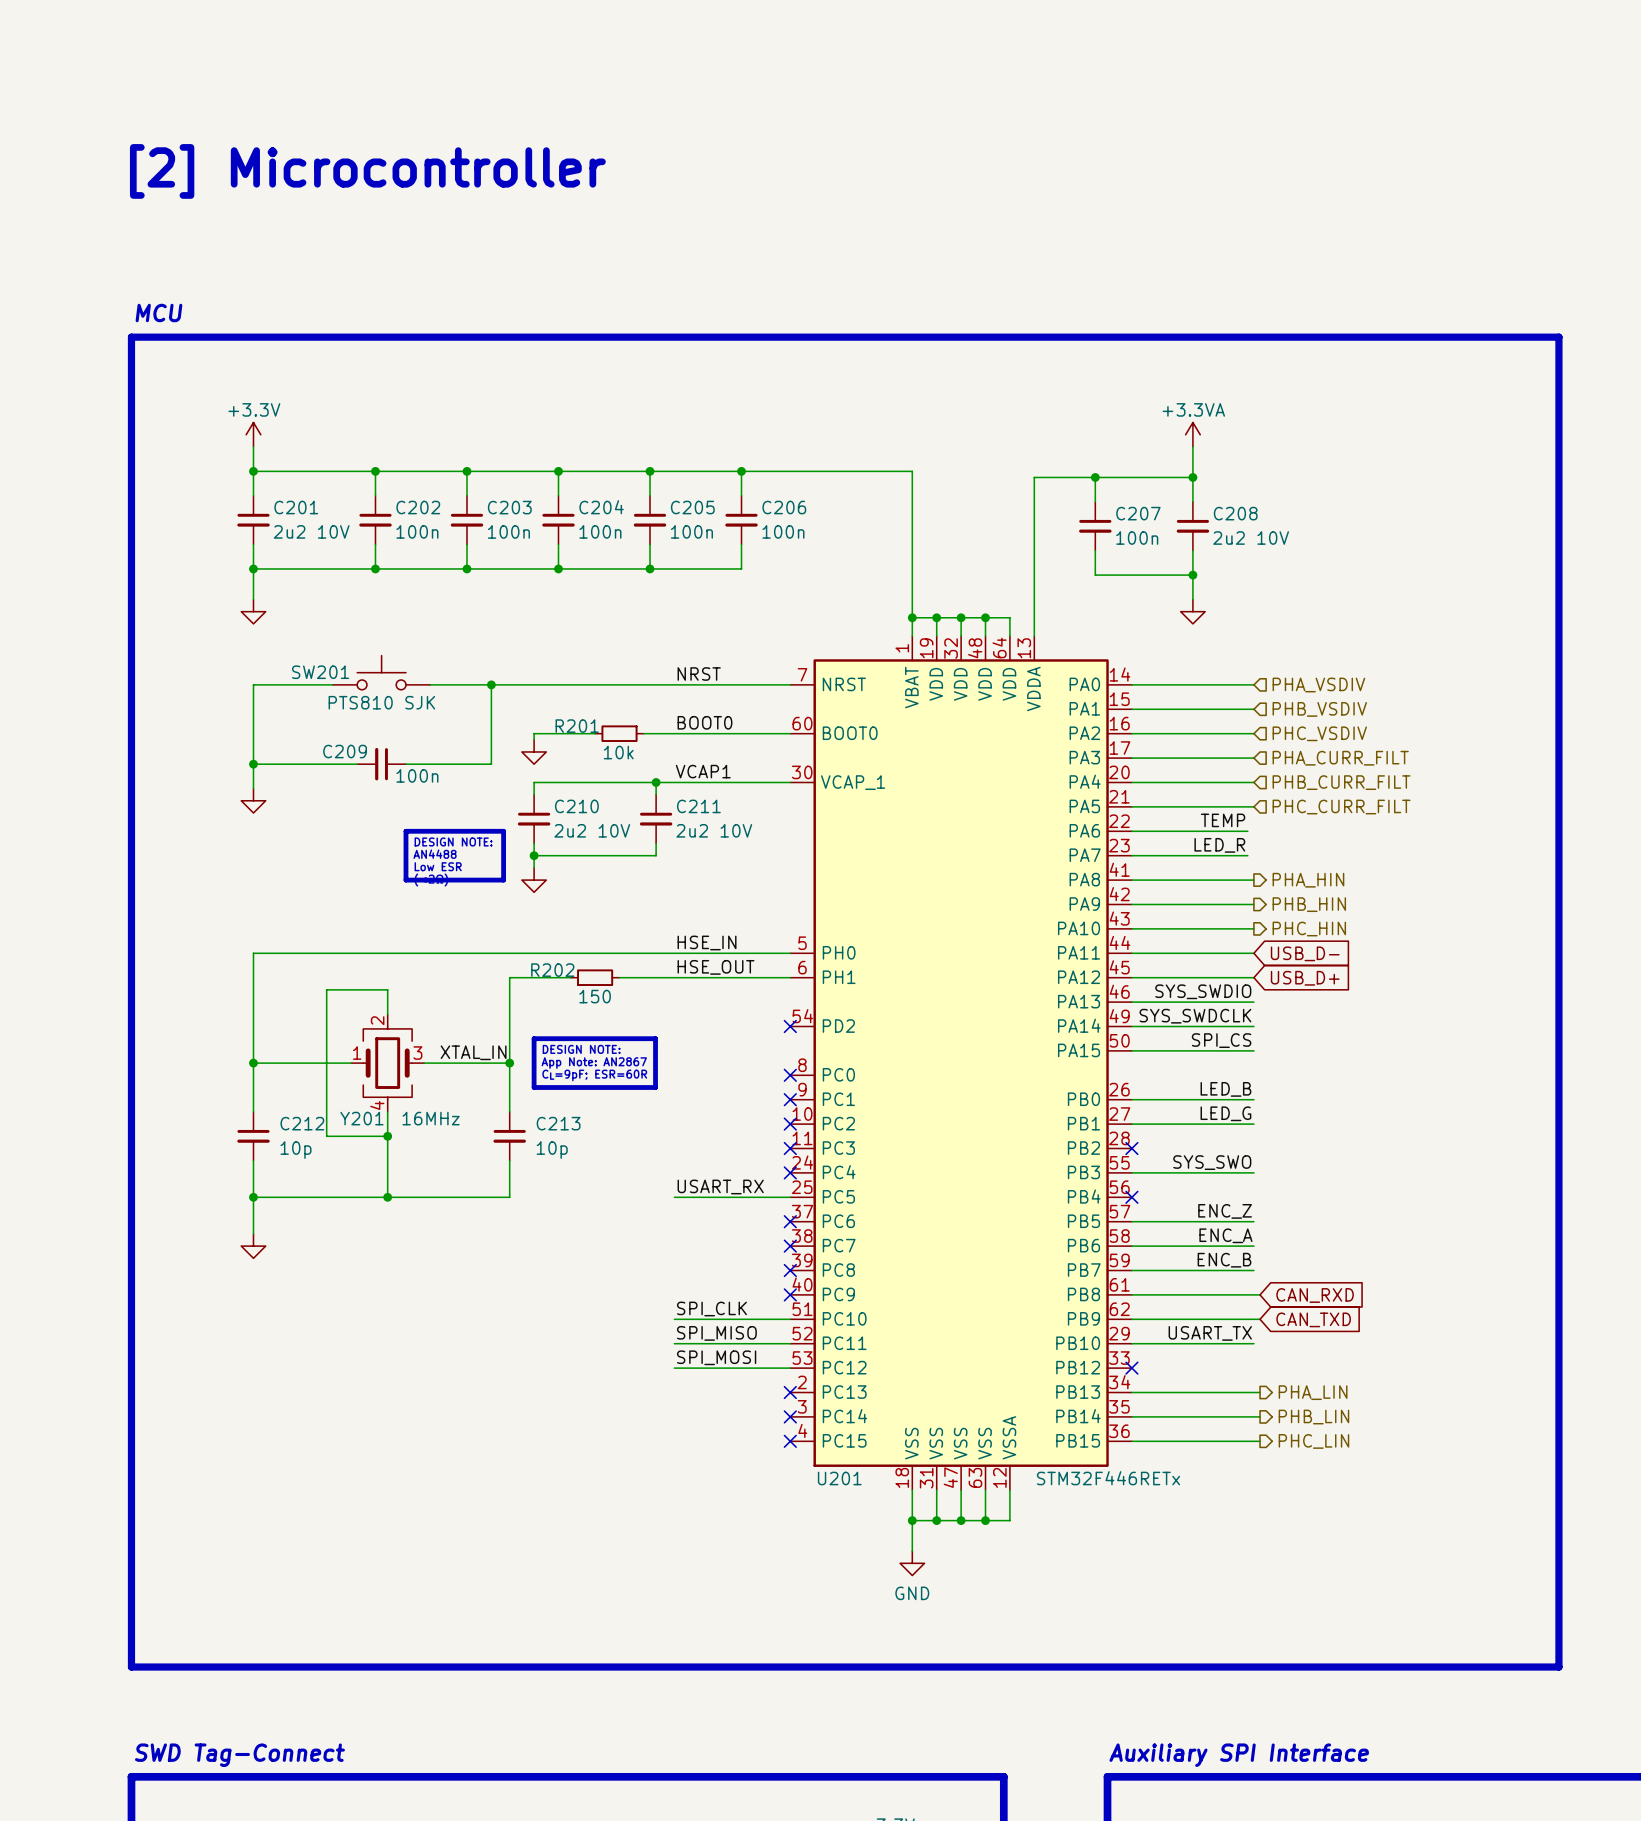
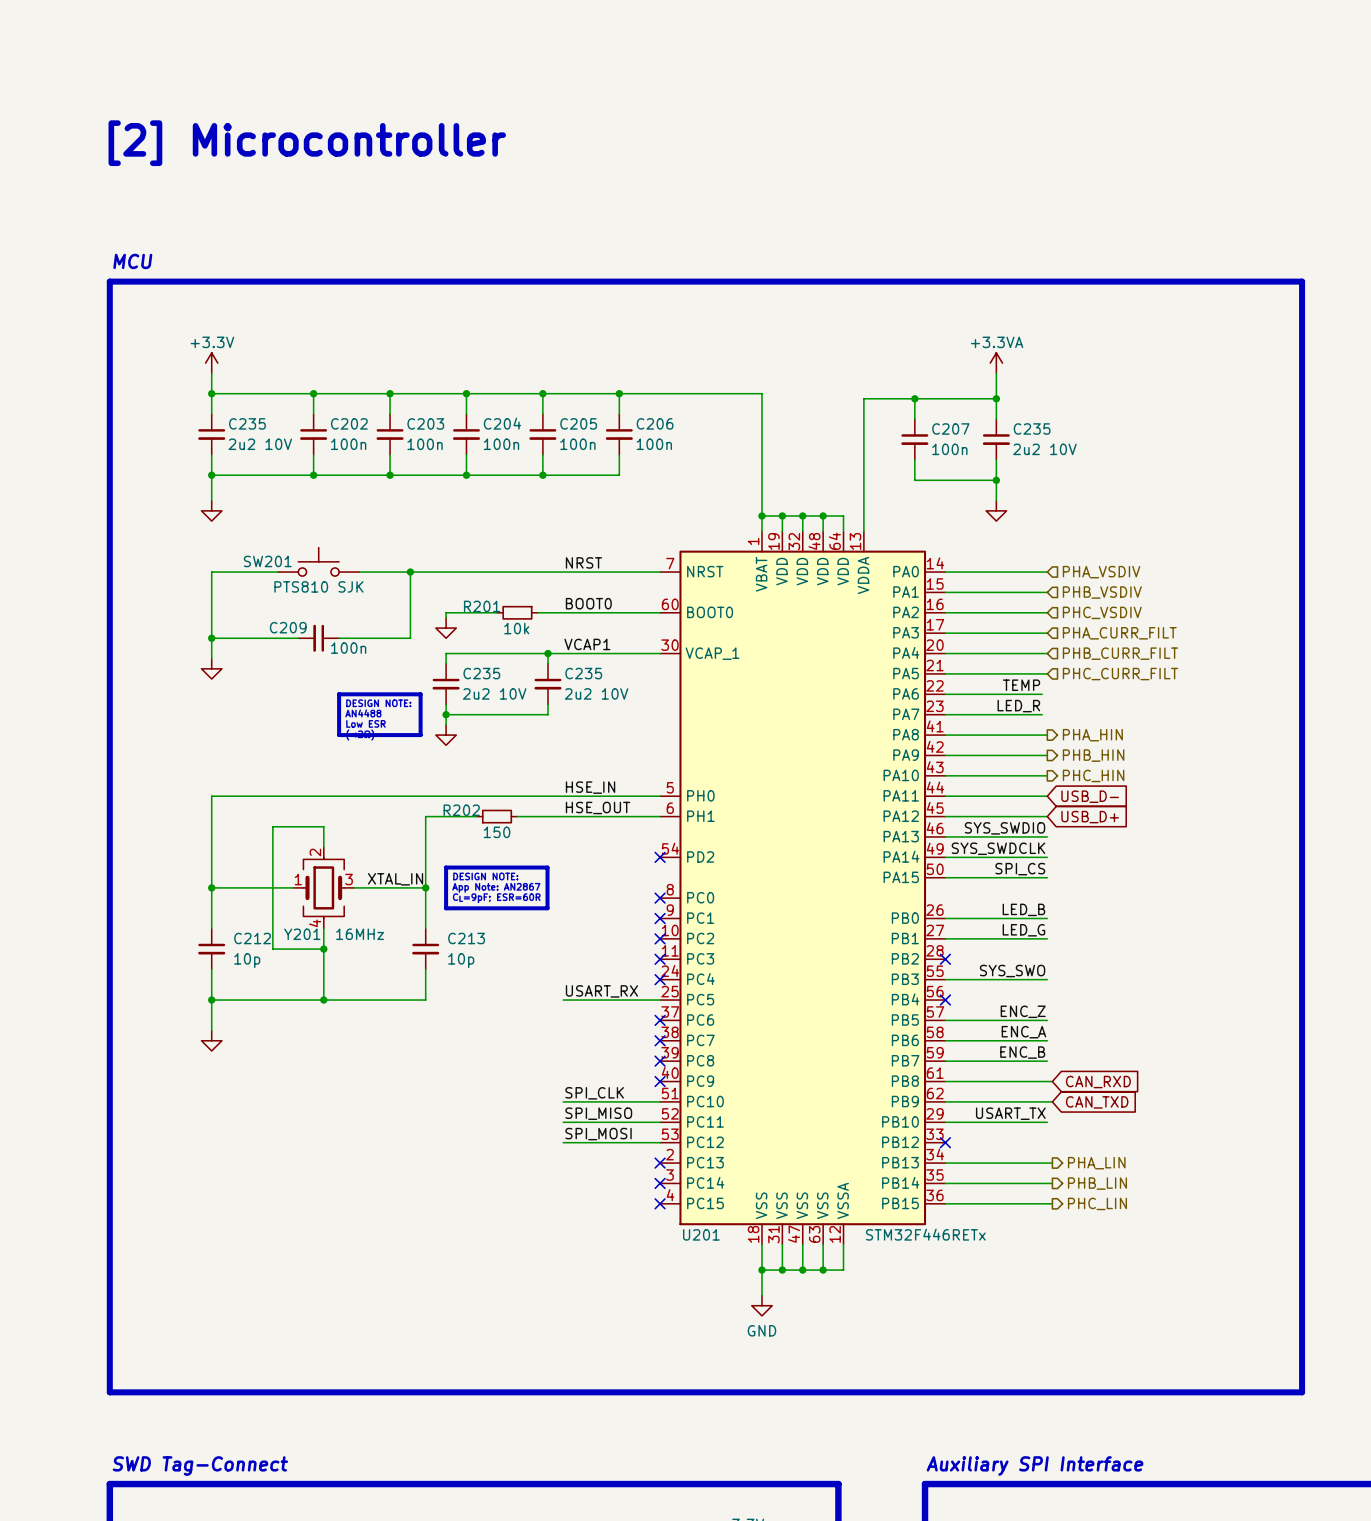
C201 name: C201 (296, 507) -> C235 (247, 423)
C208 name: C208 (1235, 513) -> C235 (1032, 428)
C210 name: C210 (576, 806) -> C235 (481, 673)
C211 name: C211 (698, 806) -> C235 (583, 673)

